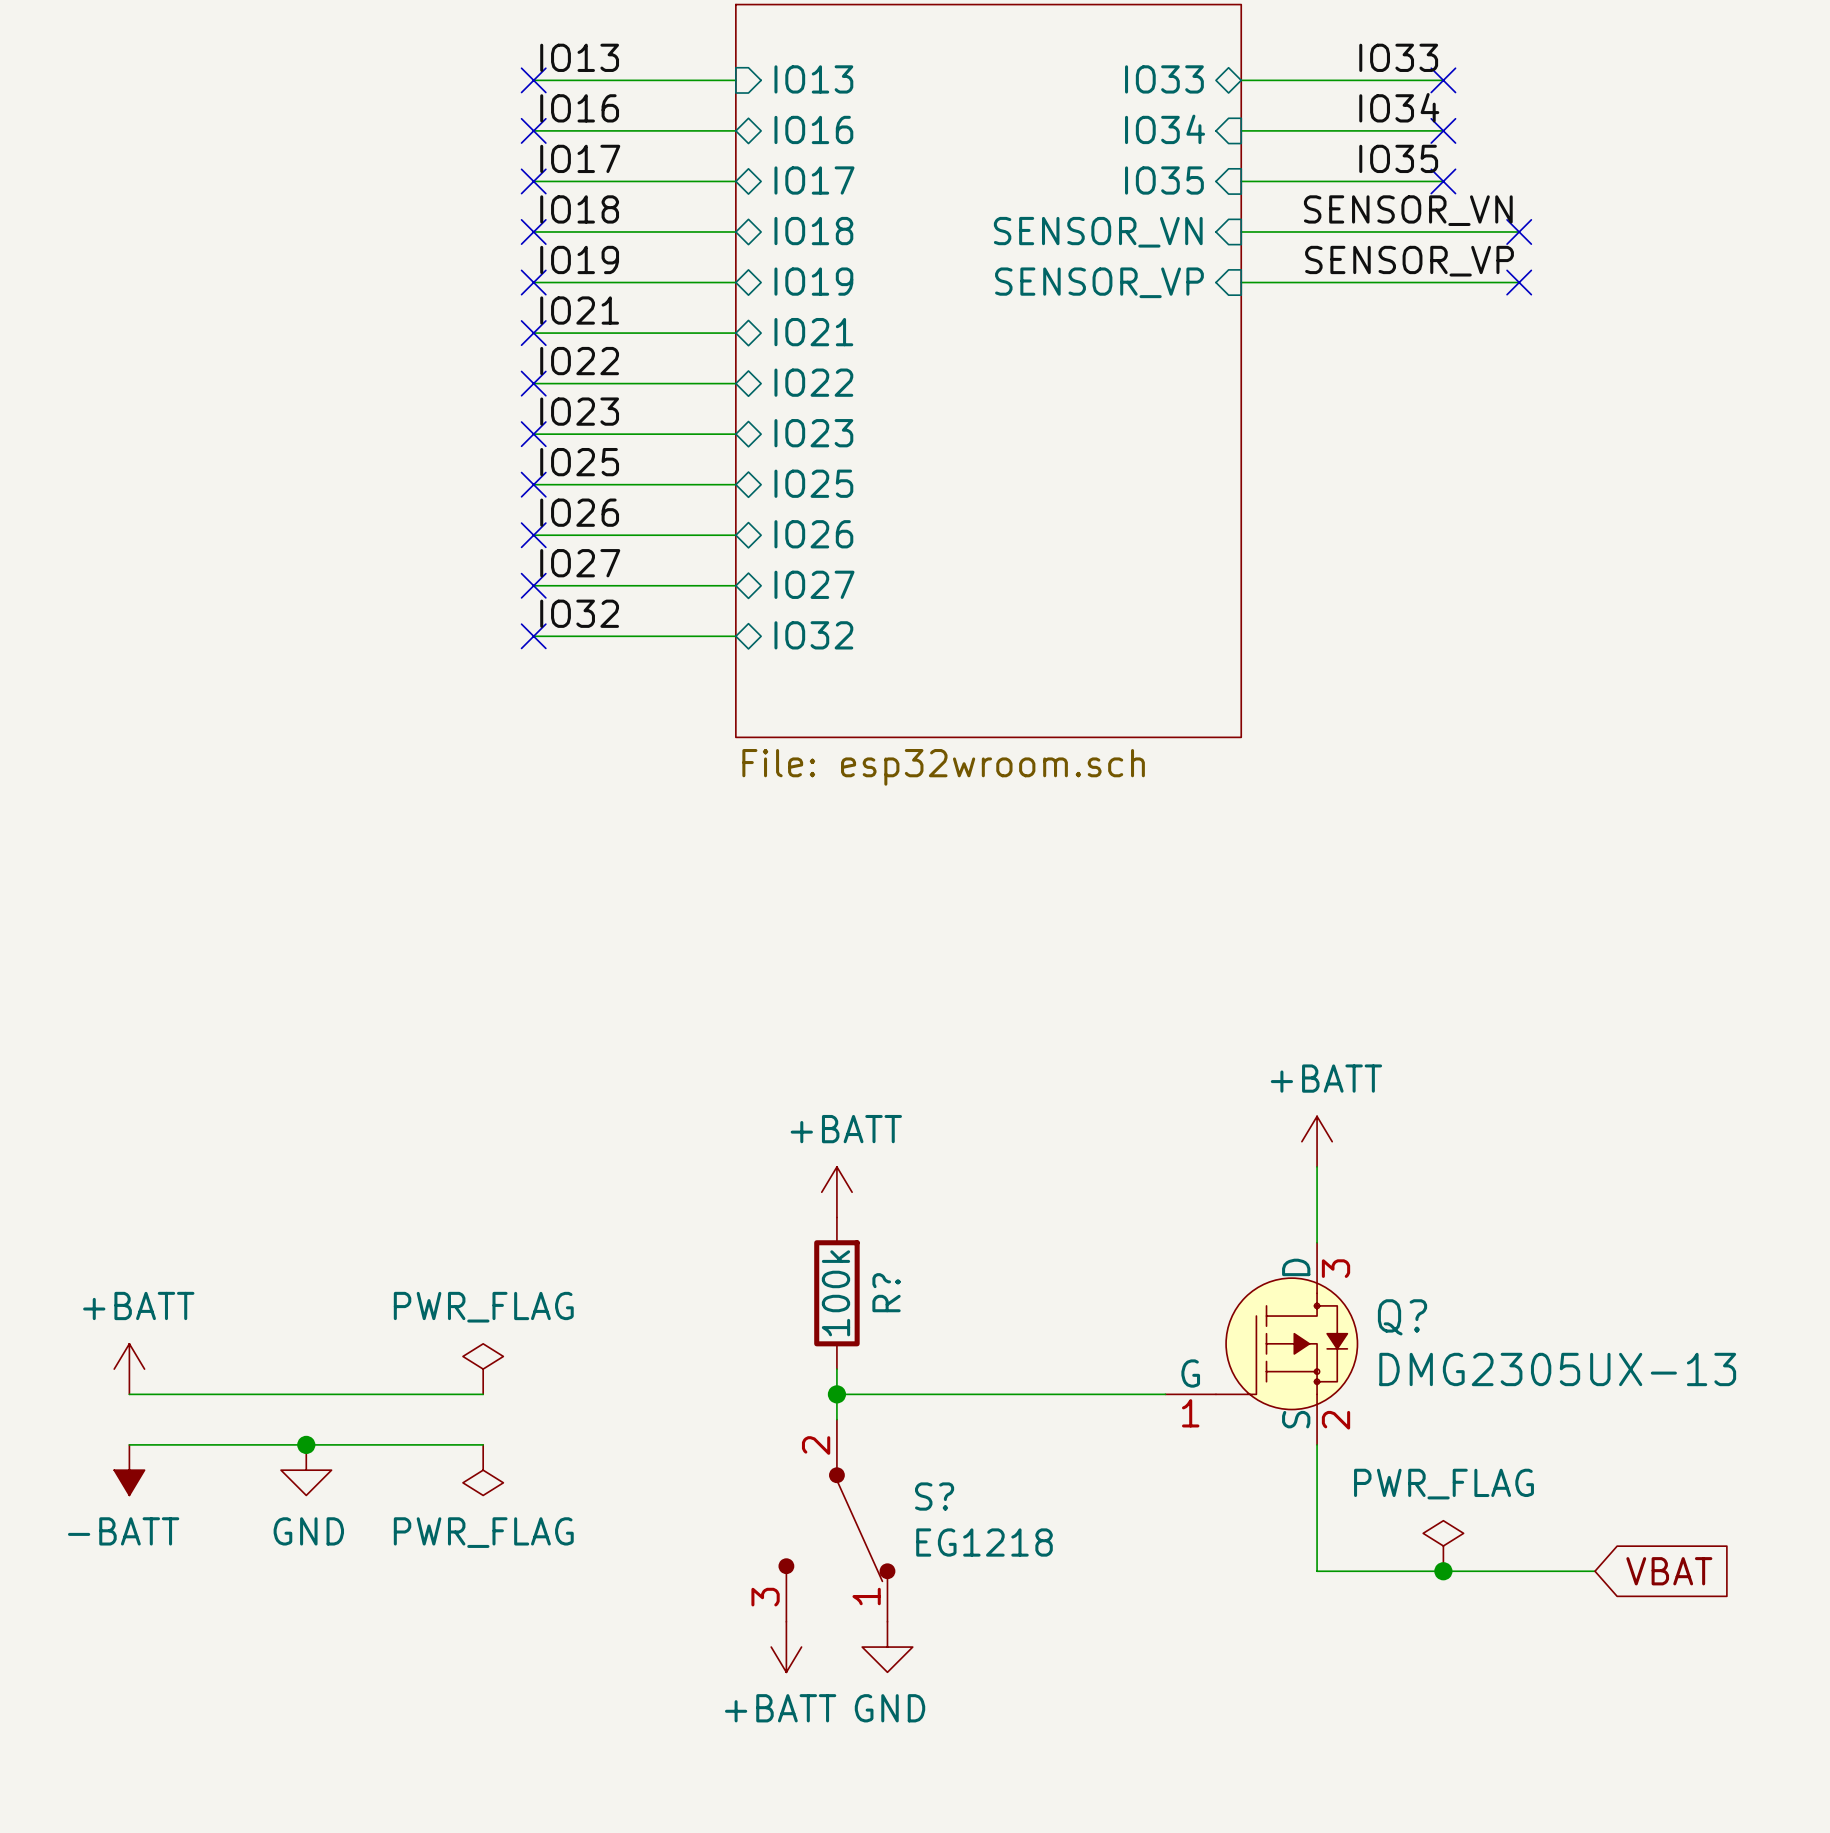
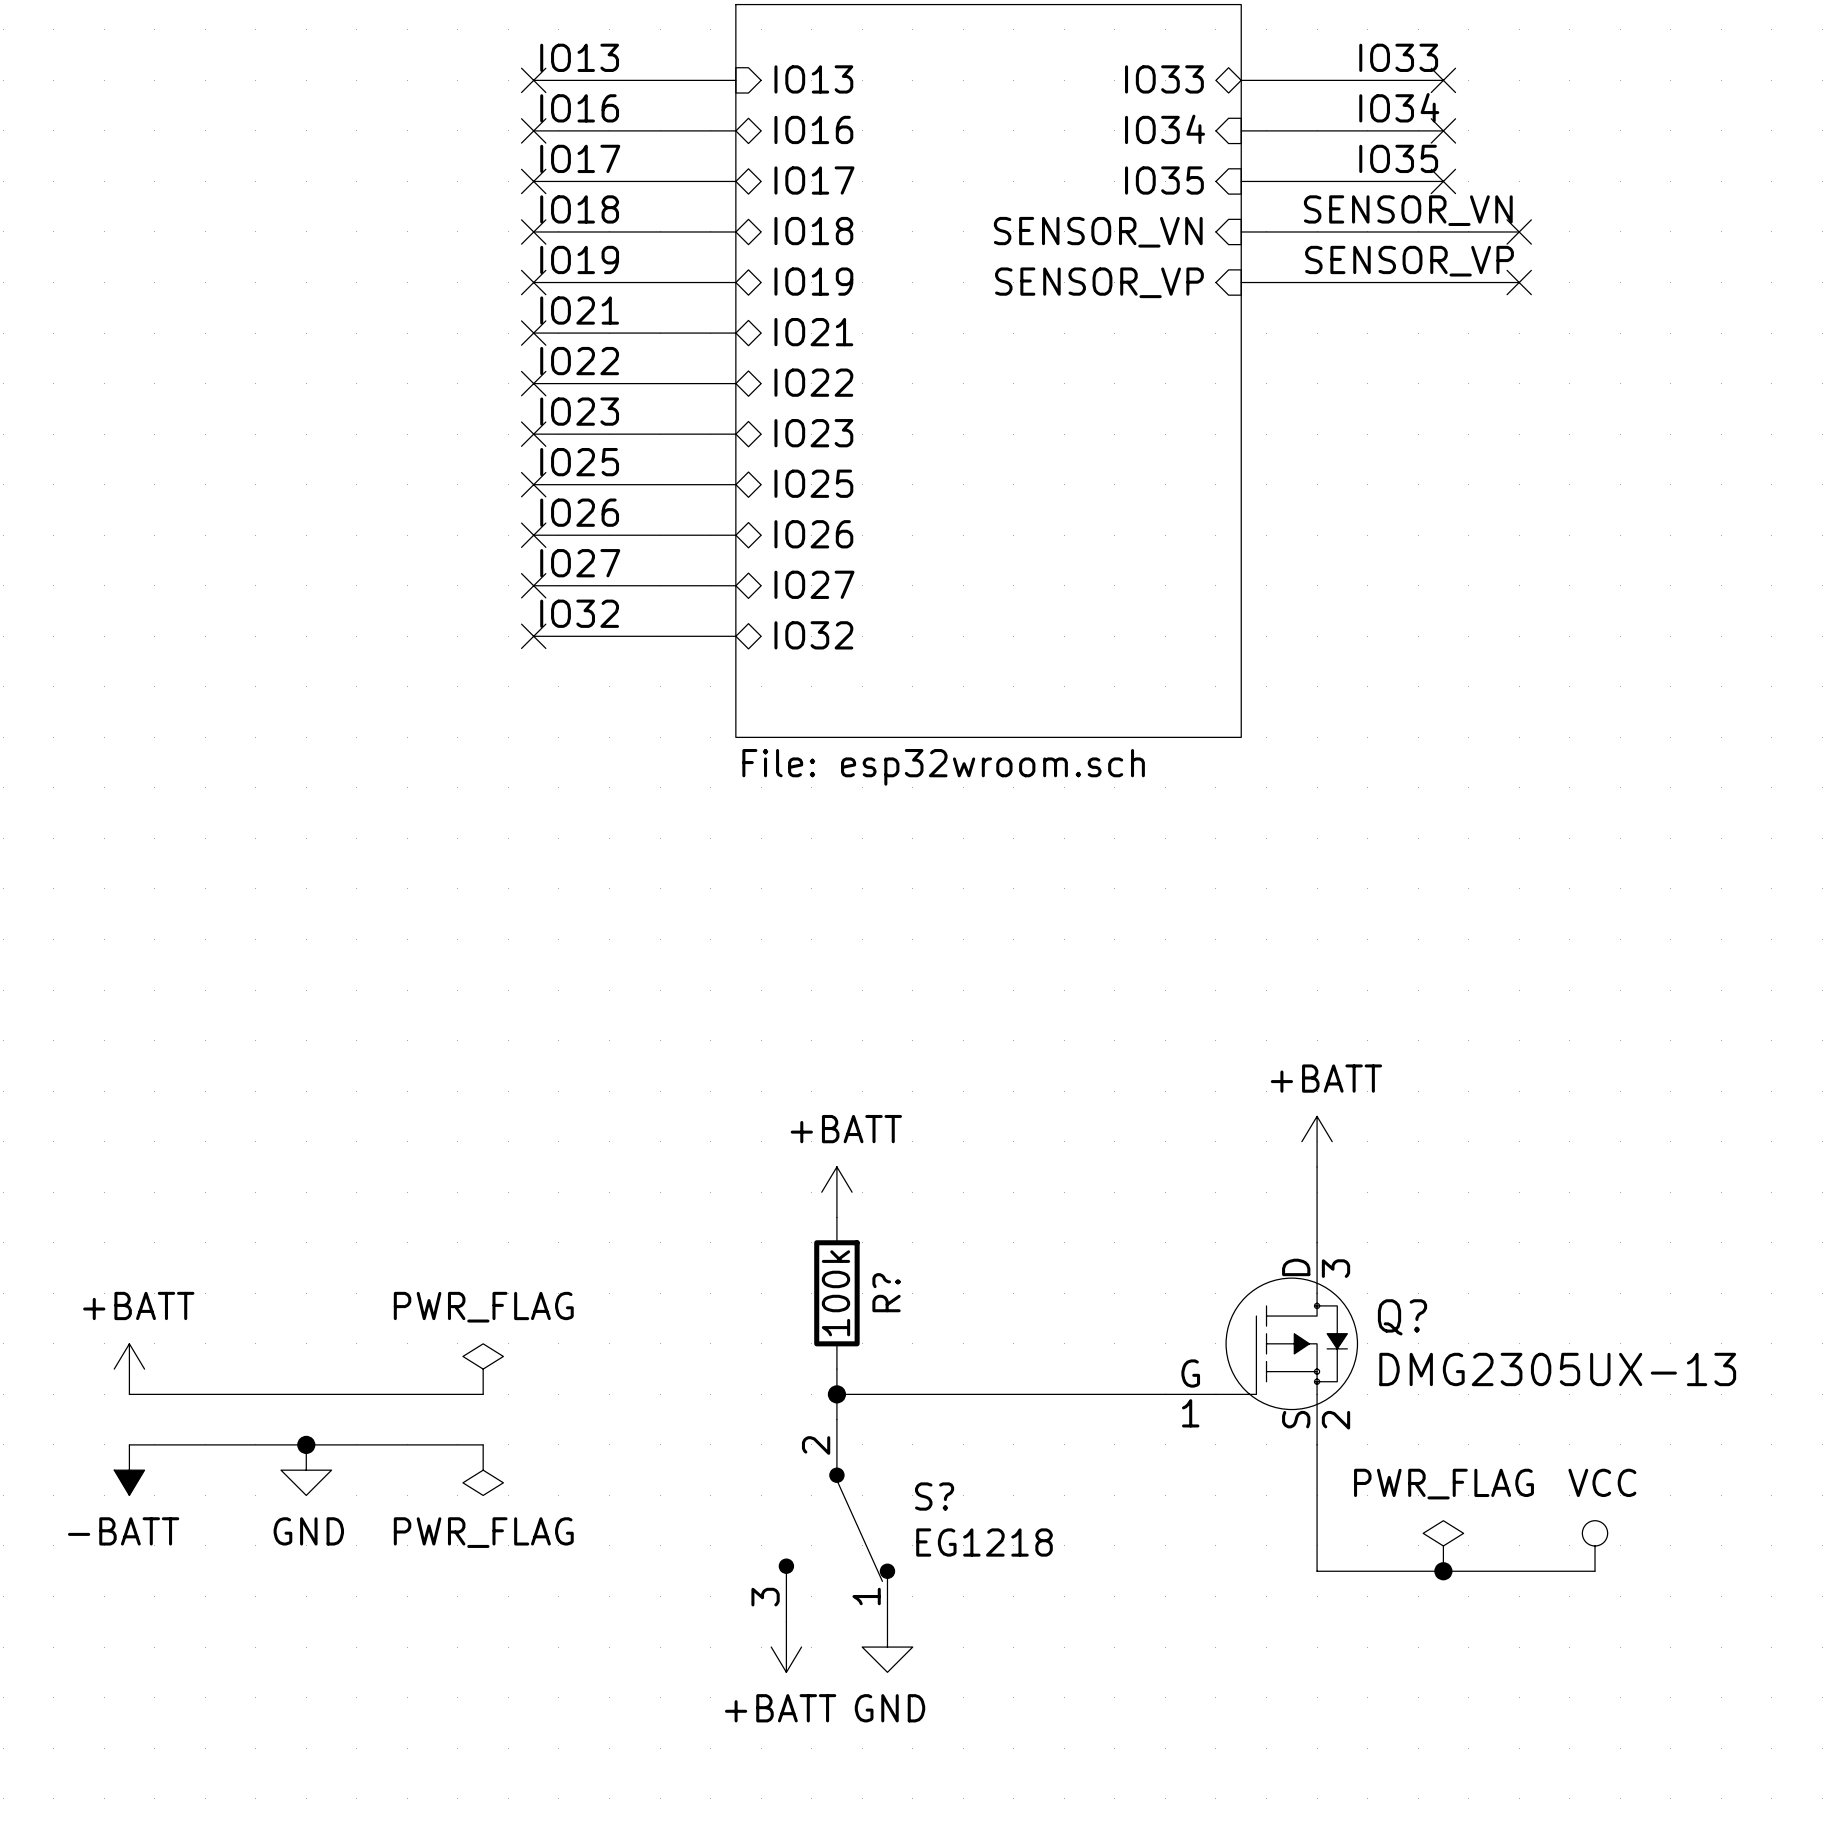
power symbol: none -> VCC (1595, 1545)
global label: VBAT (1669, 1571) -> none

